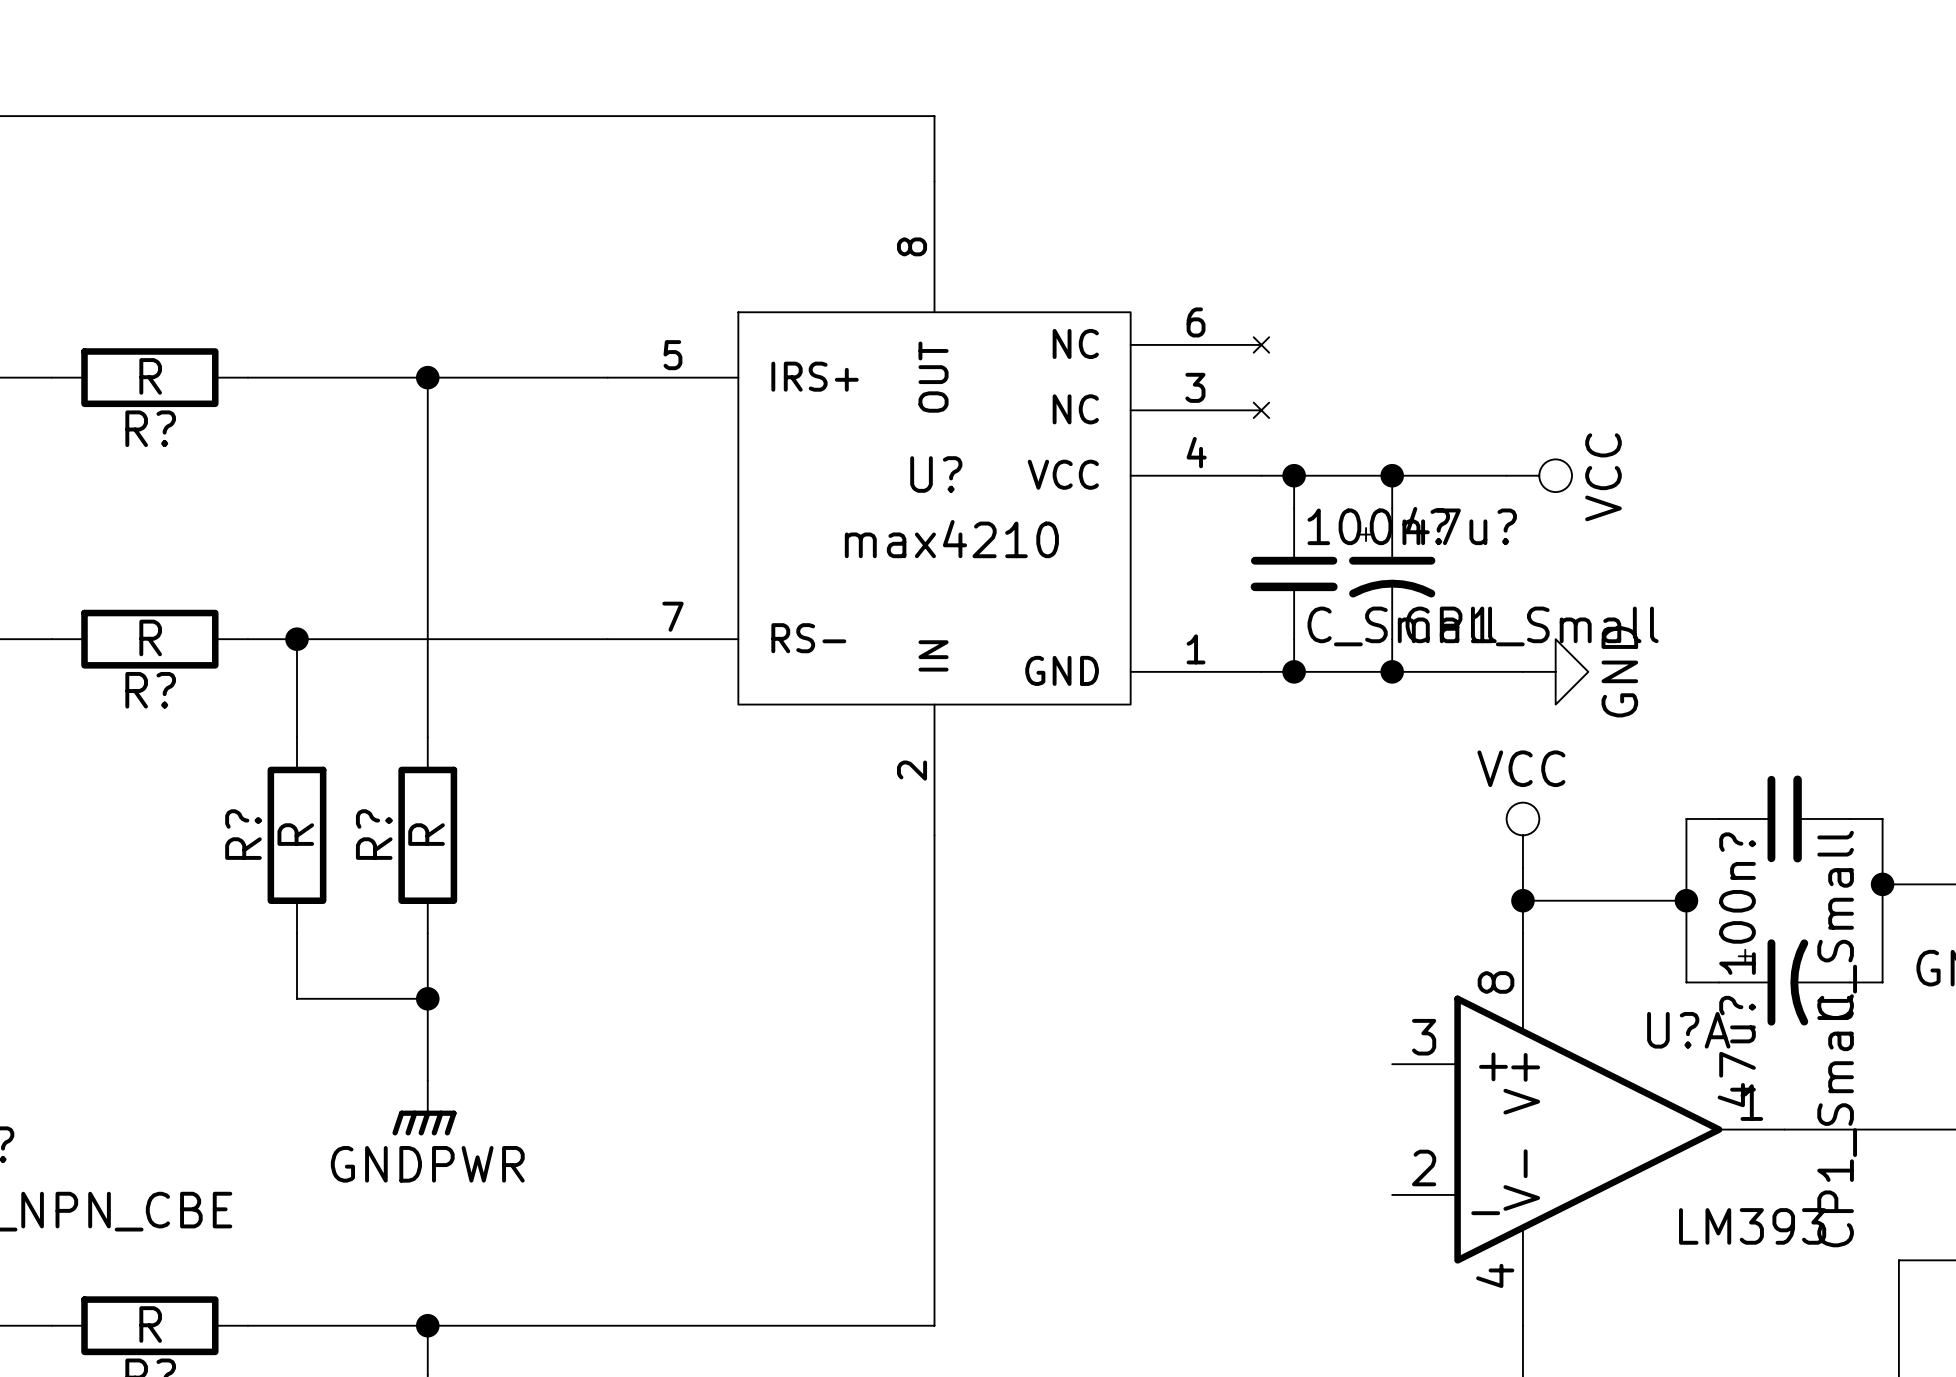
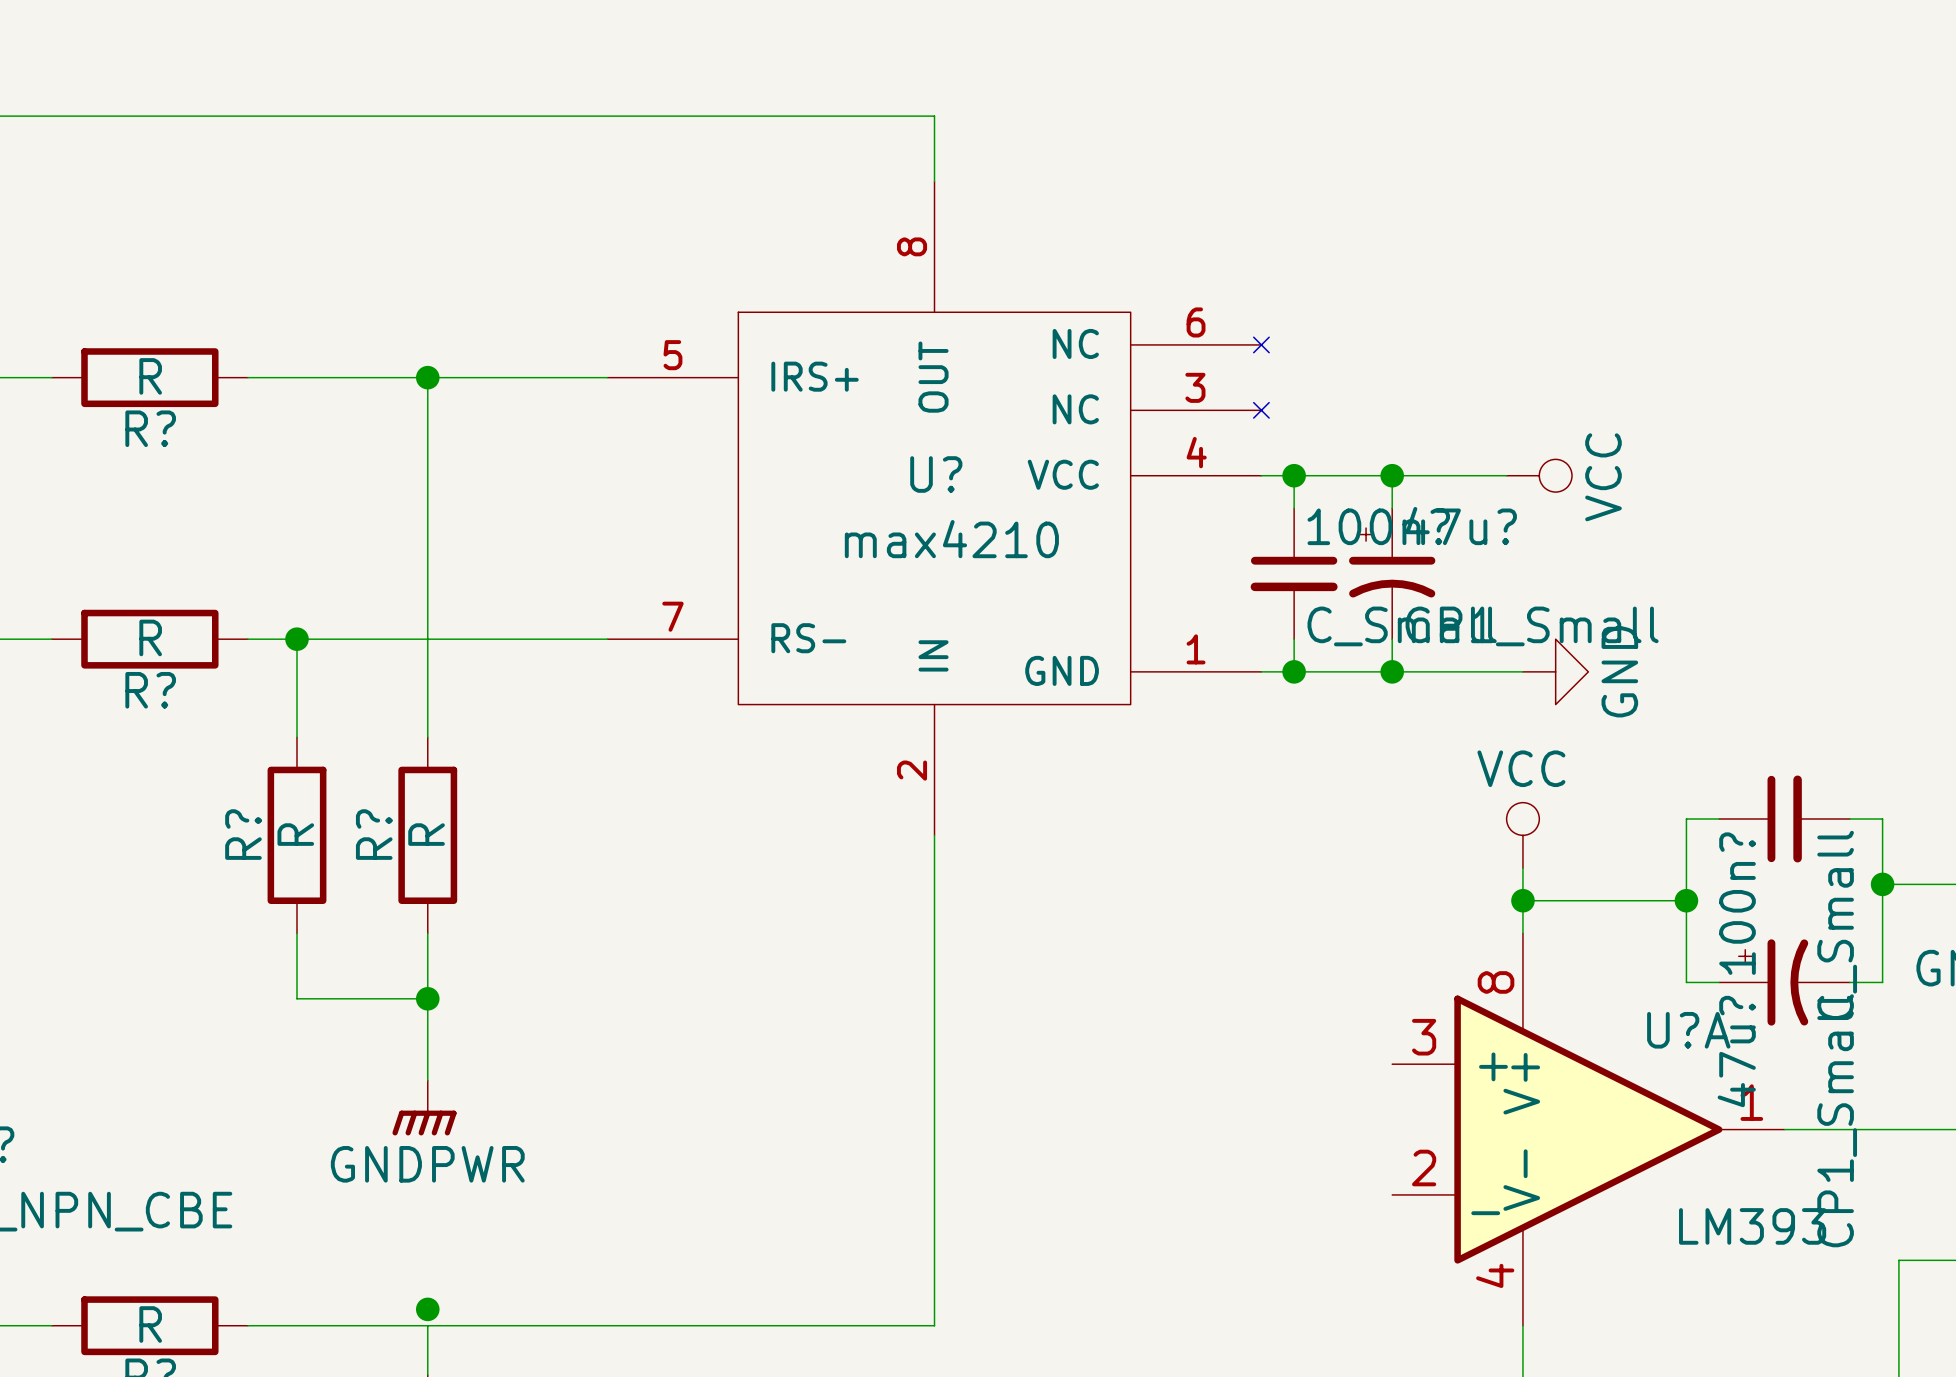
junction position: (427, 1325) -> (427, 1309)

